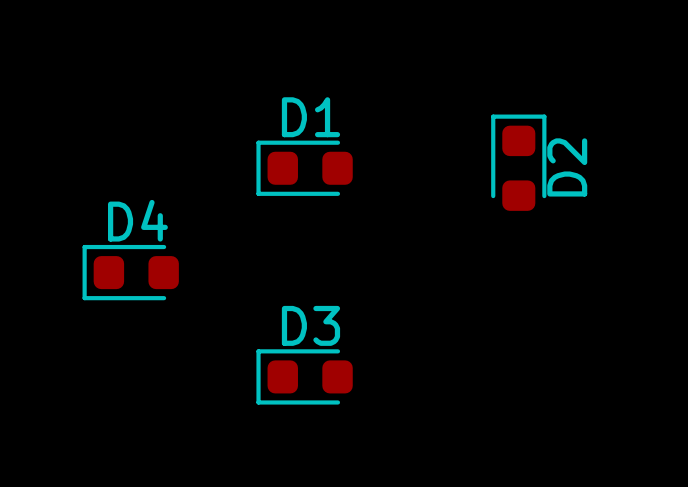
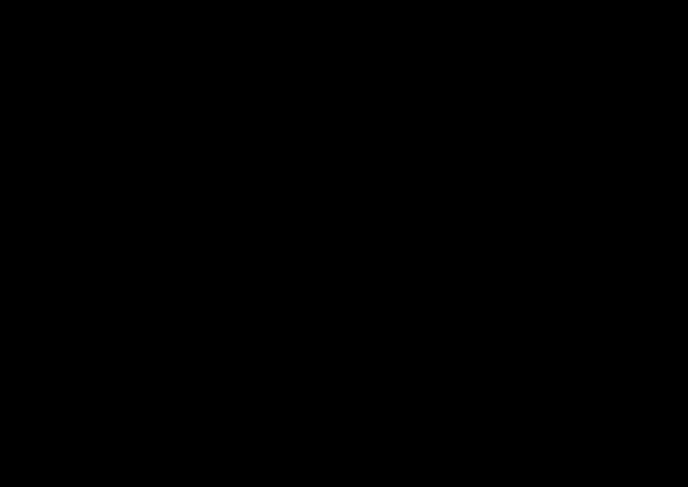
D2: (518, 162) -> none
D1: (304, 168) -> none
D4: (130, 272) -> none
D3: (304, 376) -> none

